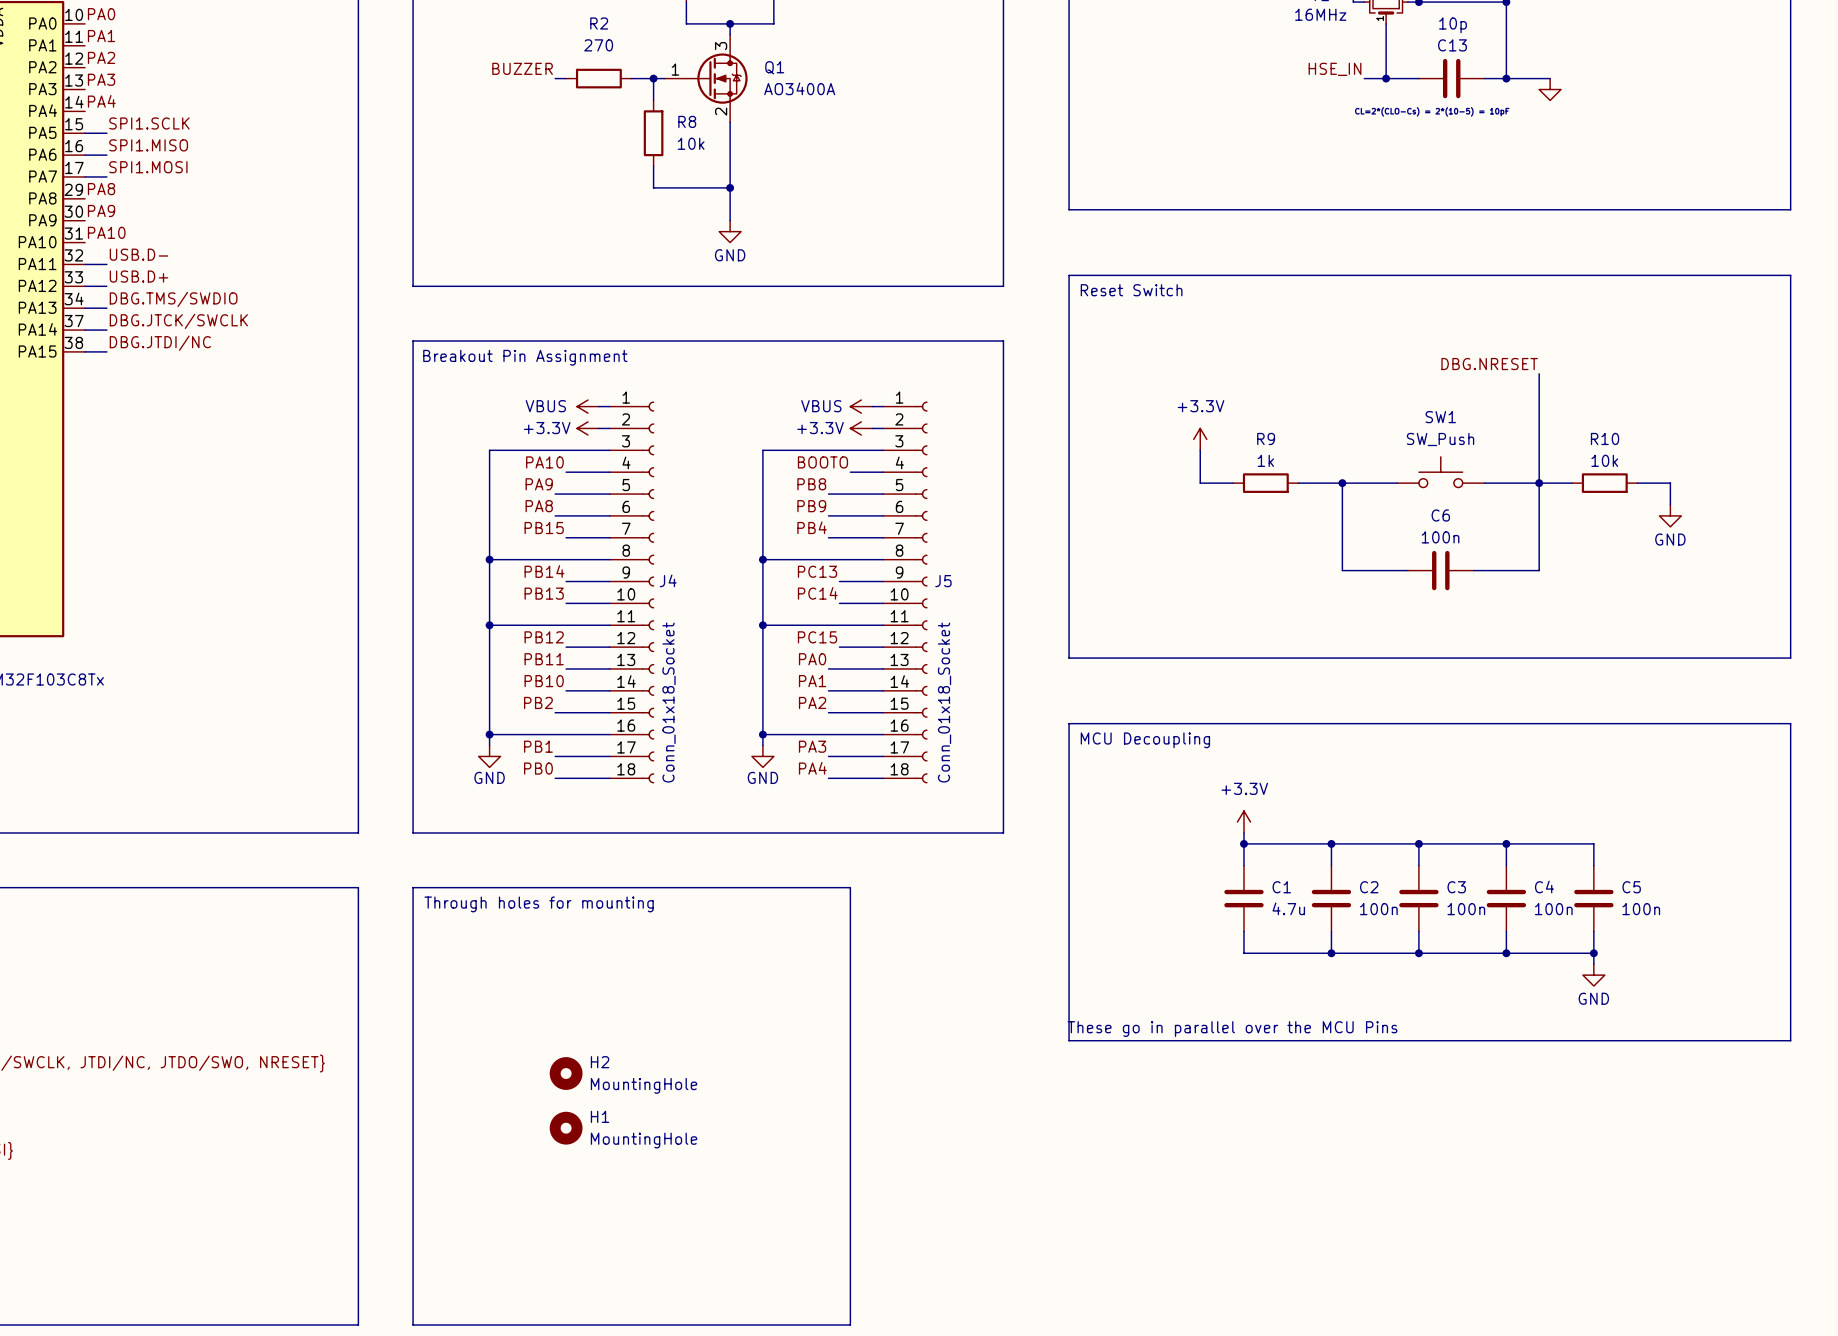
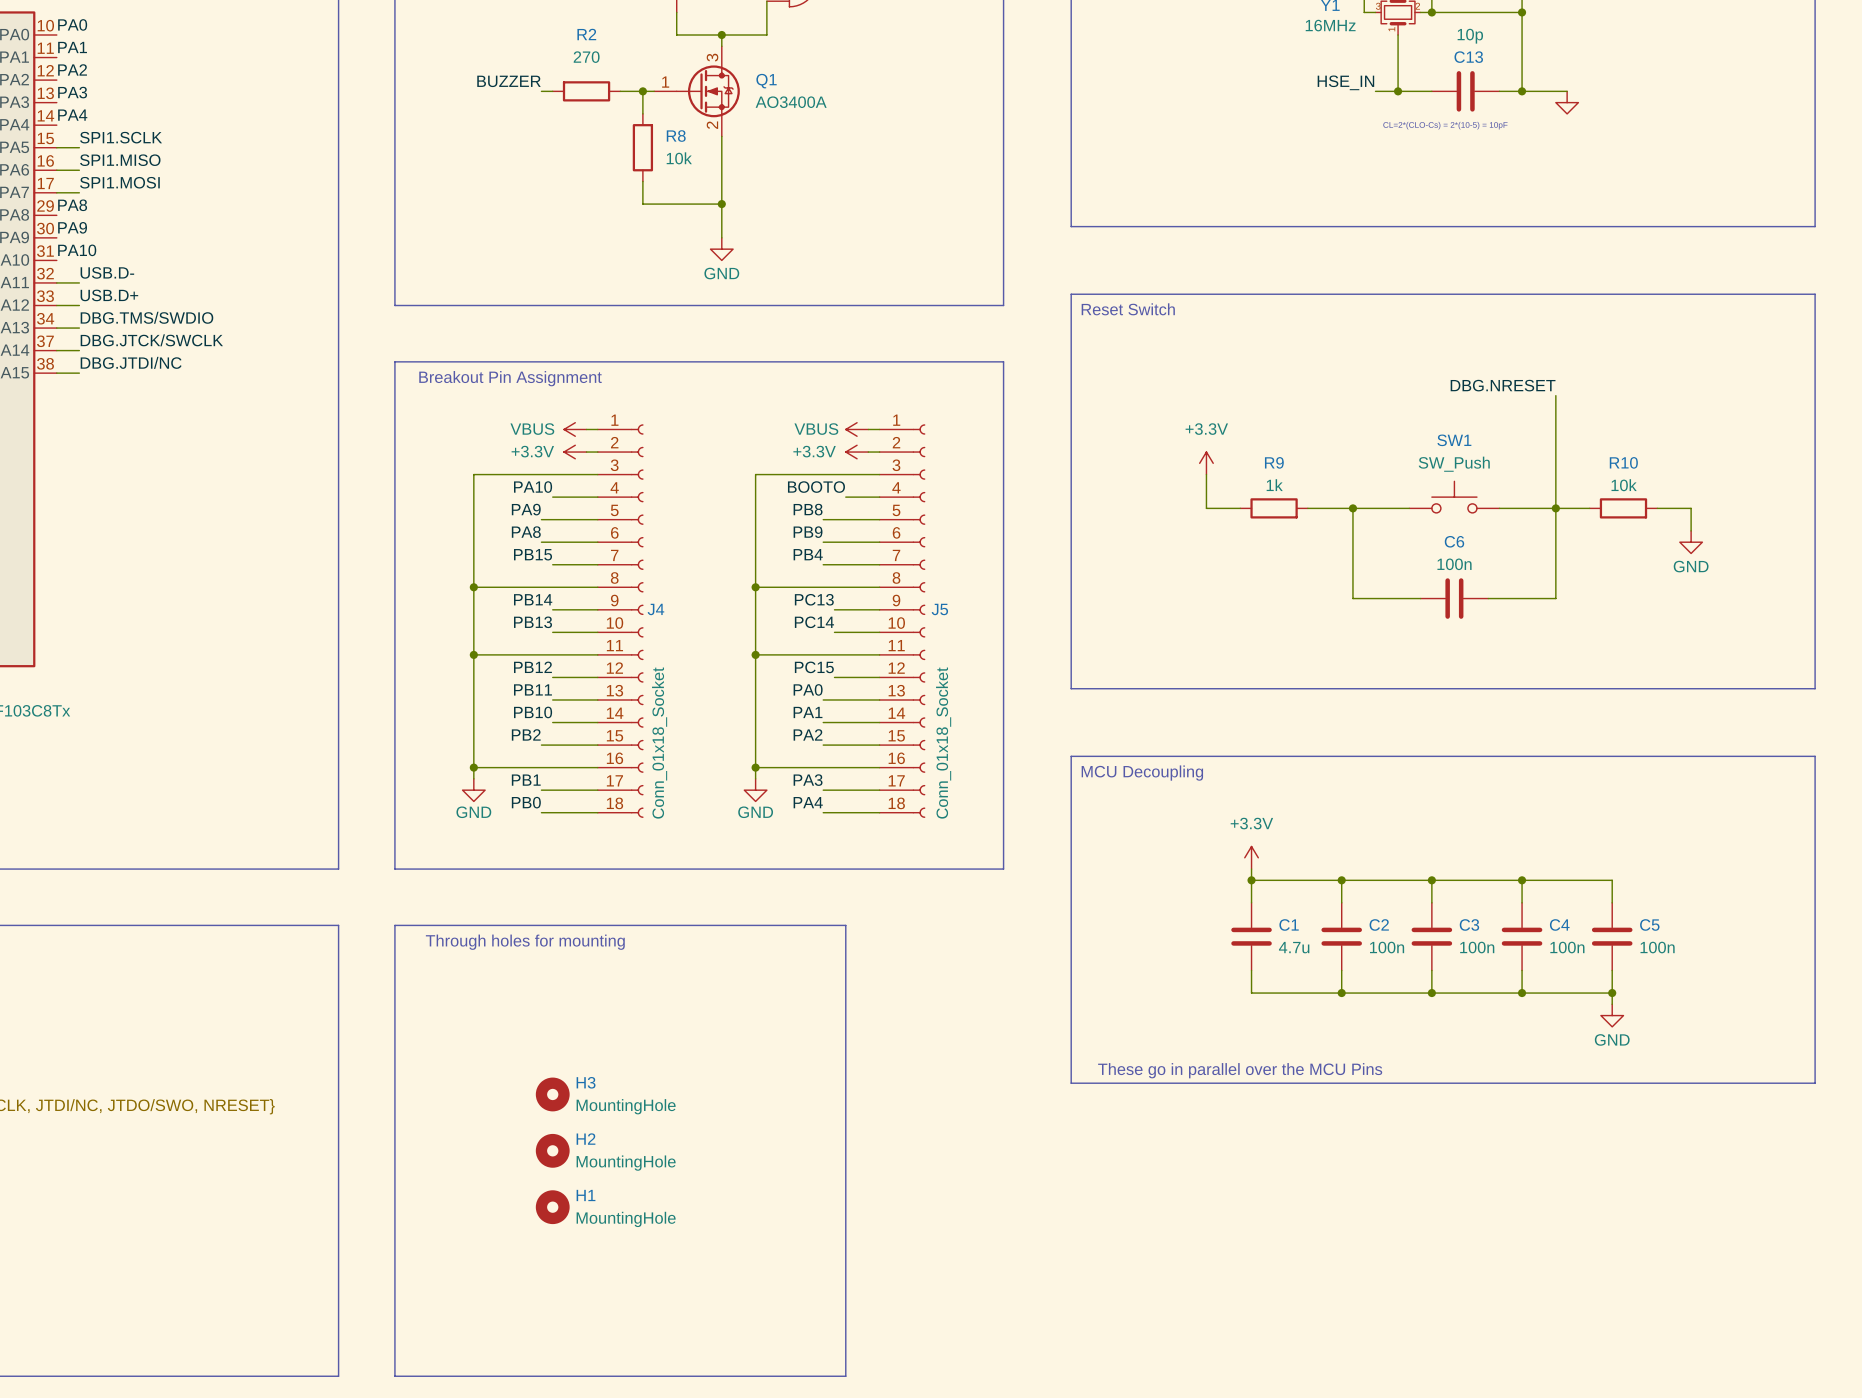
H3: none -> MountingHole (552, 1094)
H2 position: (566, 1073) -> (552, 1150)
H1 position: (566, 1128) -> (552, 1207)

